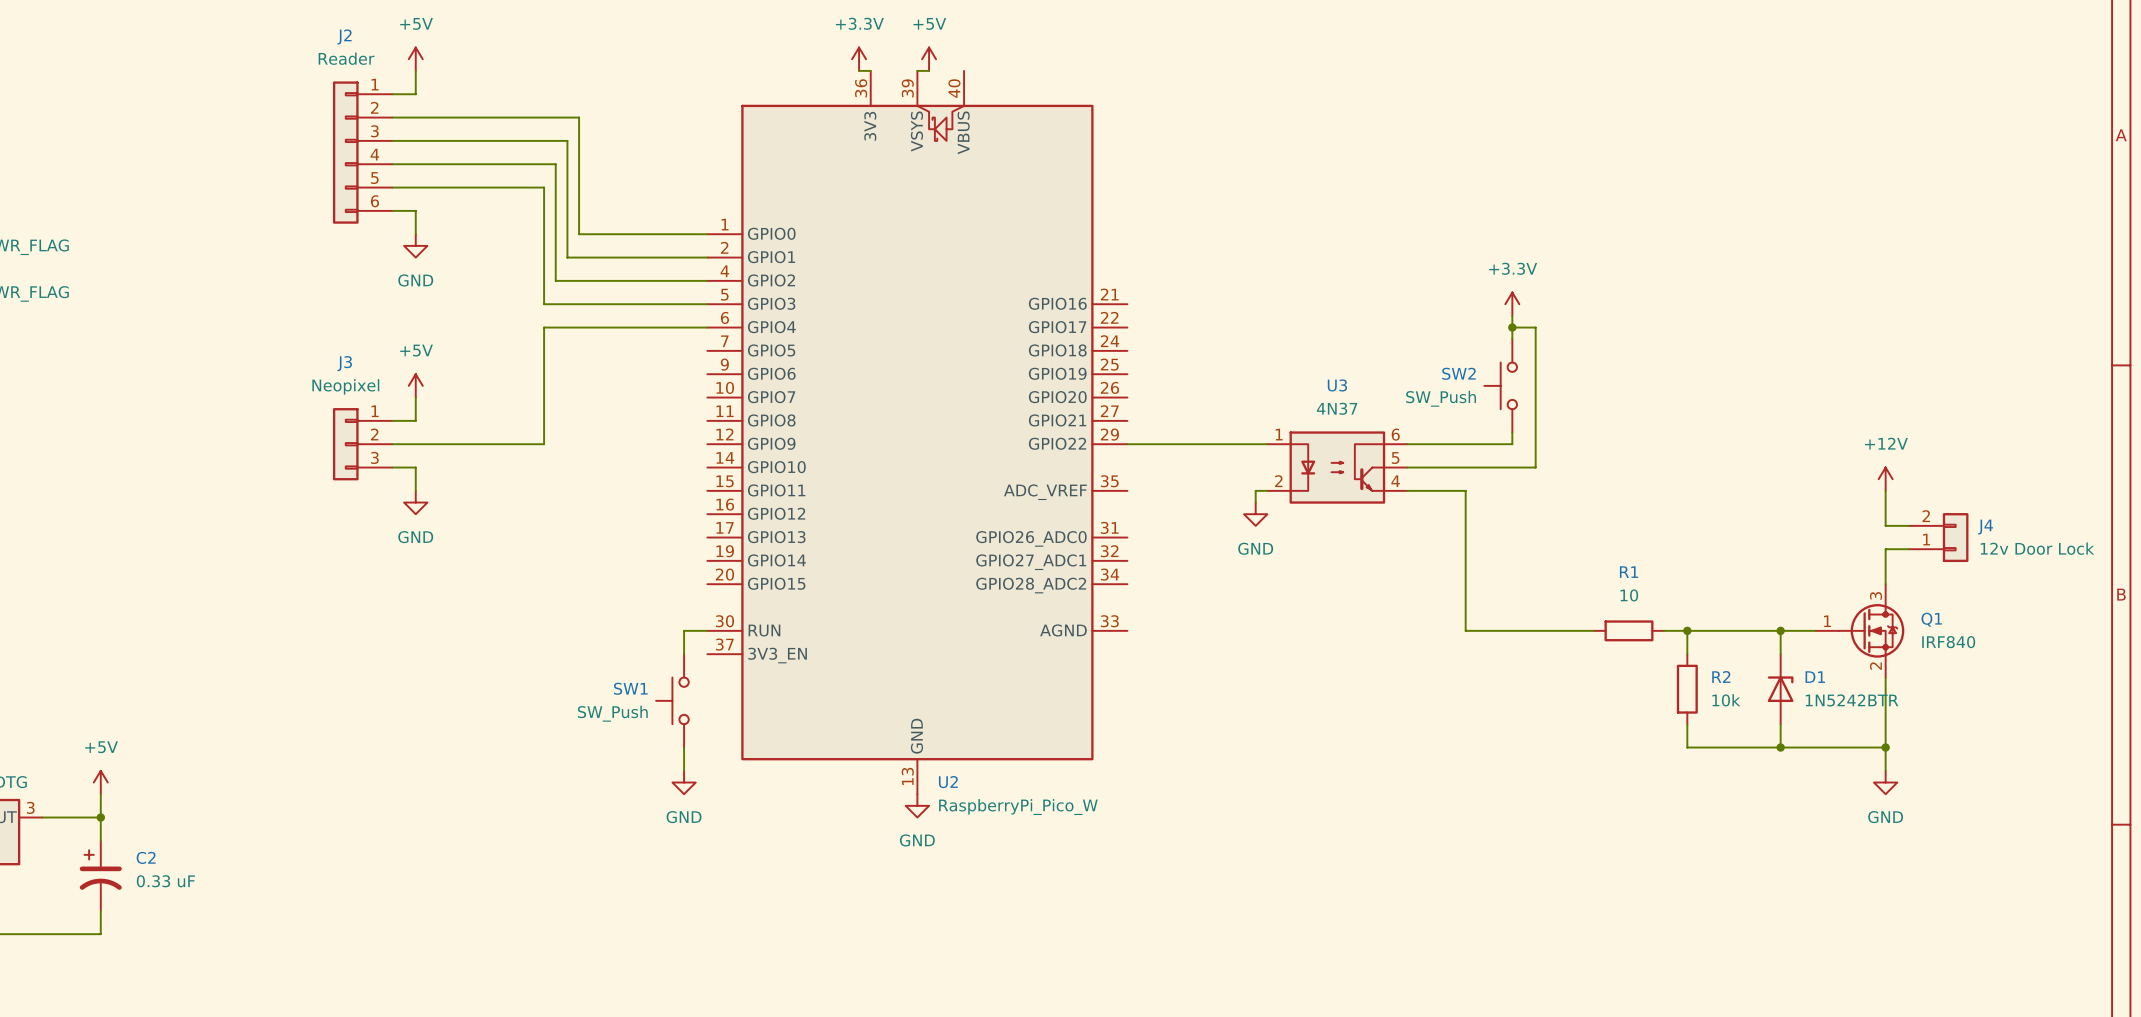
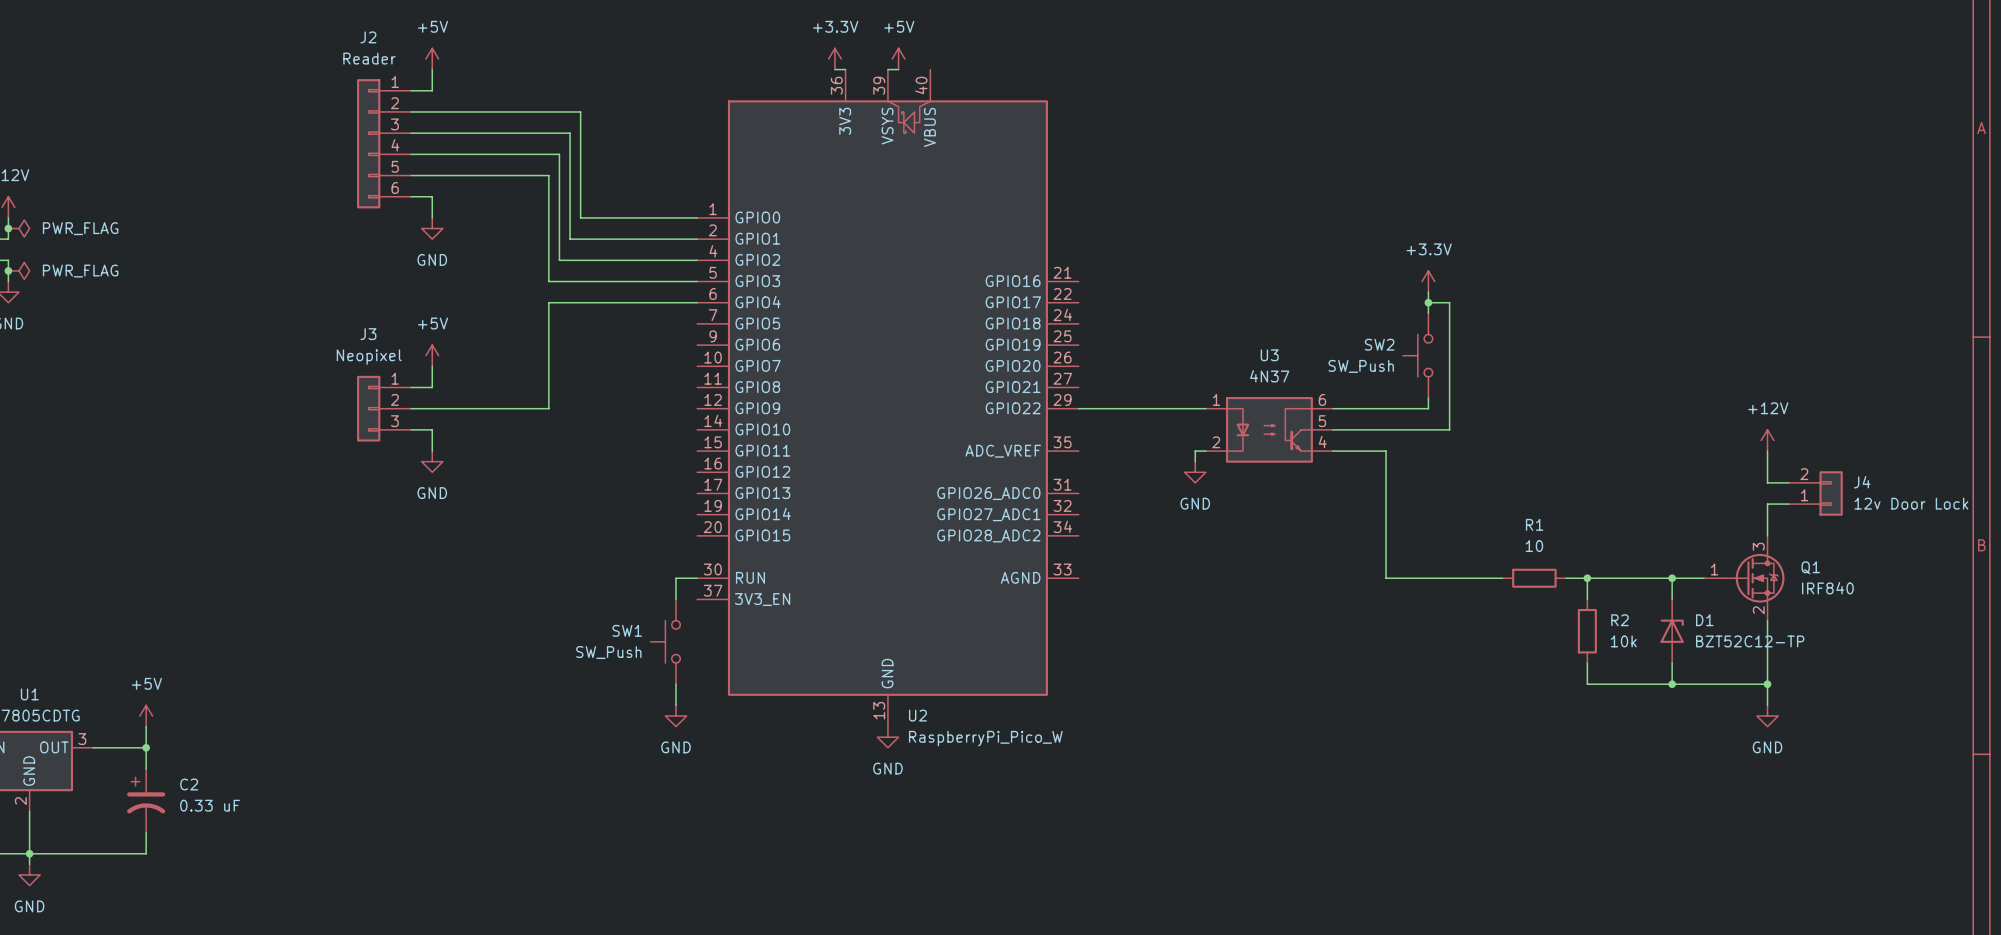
D1 value: 1N5242BTR (1852, 700) -> BZT52C12-TP (1750, 641)

